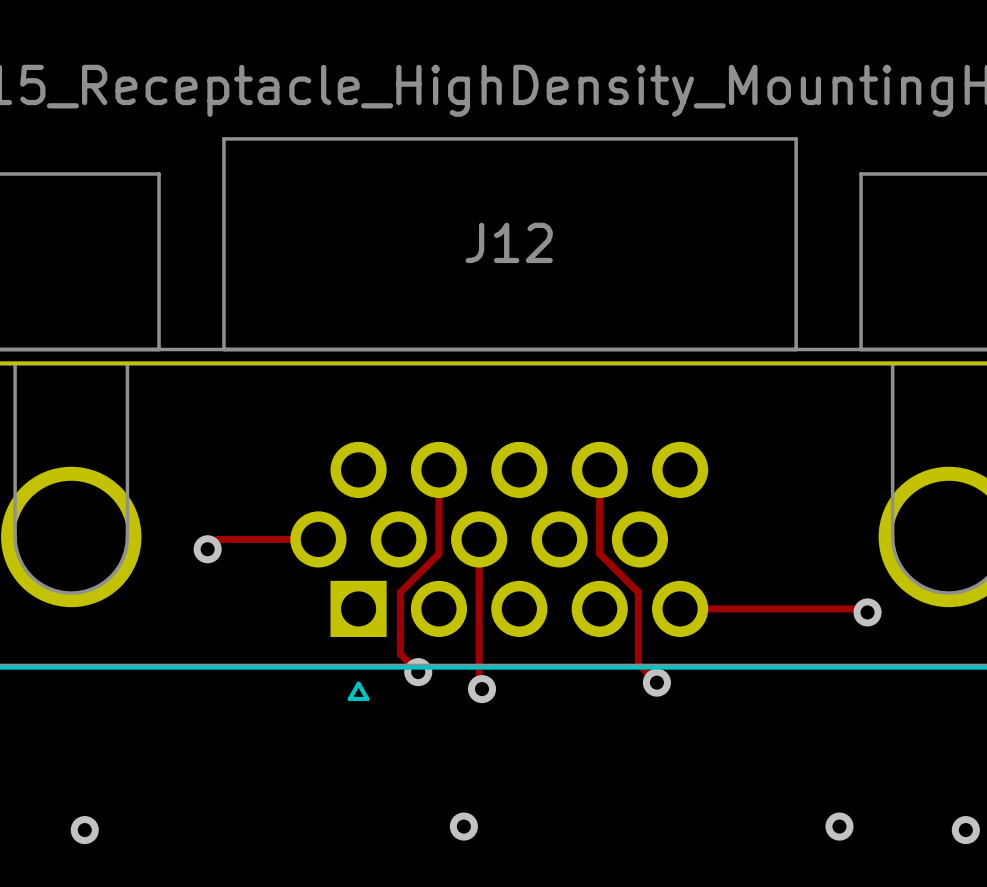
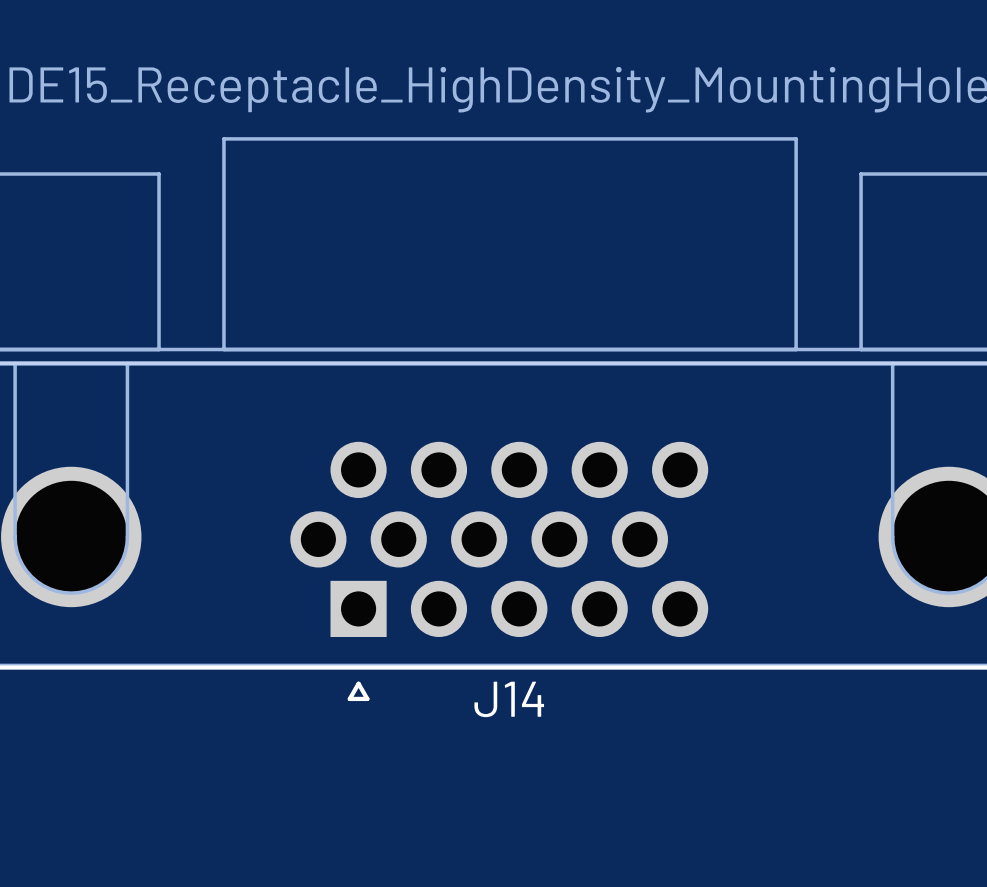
J12 name: J12 (509, 242) -> J14 (509, 699)
track: (438, 469) (438, 553) (400, 592) (400, 654) (418, 672) -> none
track: (599, 469) (599, 553) (638, 592) (638, 664) (656, 682) -> none
track: (318, 539) (217, 539) (207, 549) -> none
track: (479, 539) (479, 686) (482, 689) -> none
via: (207, 549) -> none
track: (680, 608) (864, 608) (867, 612) -> none
via: (867, 612) -> none
via: (418, 672) -> none
via: (656, 682) -> none
via: (482, 689) -> none
via: (463, 826) -> none
via: (839, 826) -> none
via: (84, 830) -> none
via: (965, 830) -> none

